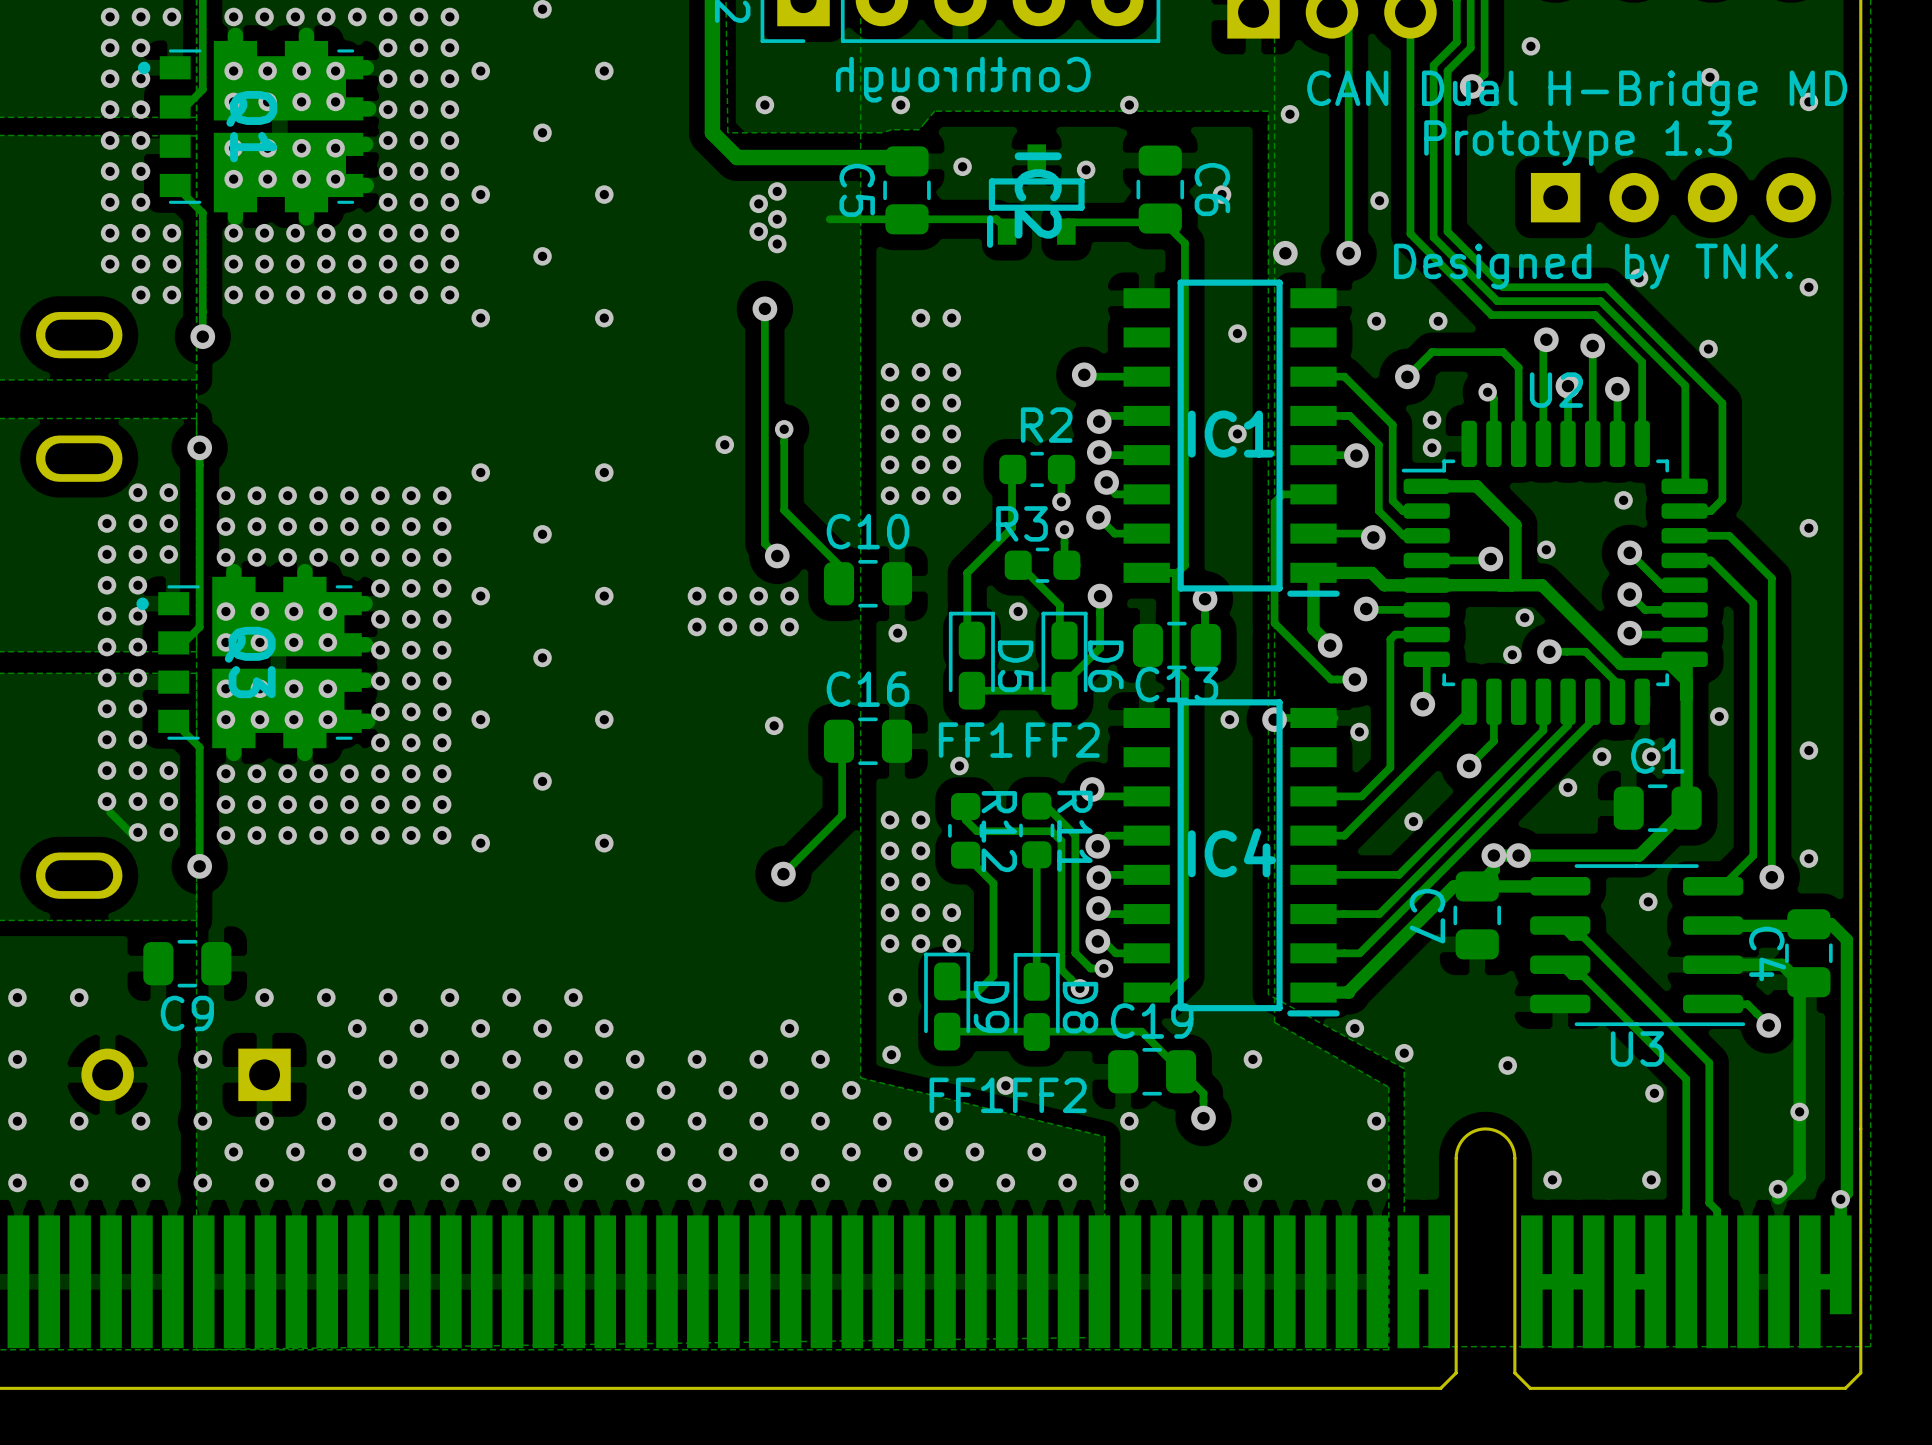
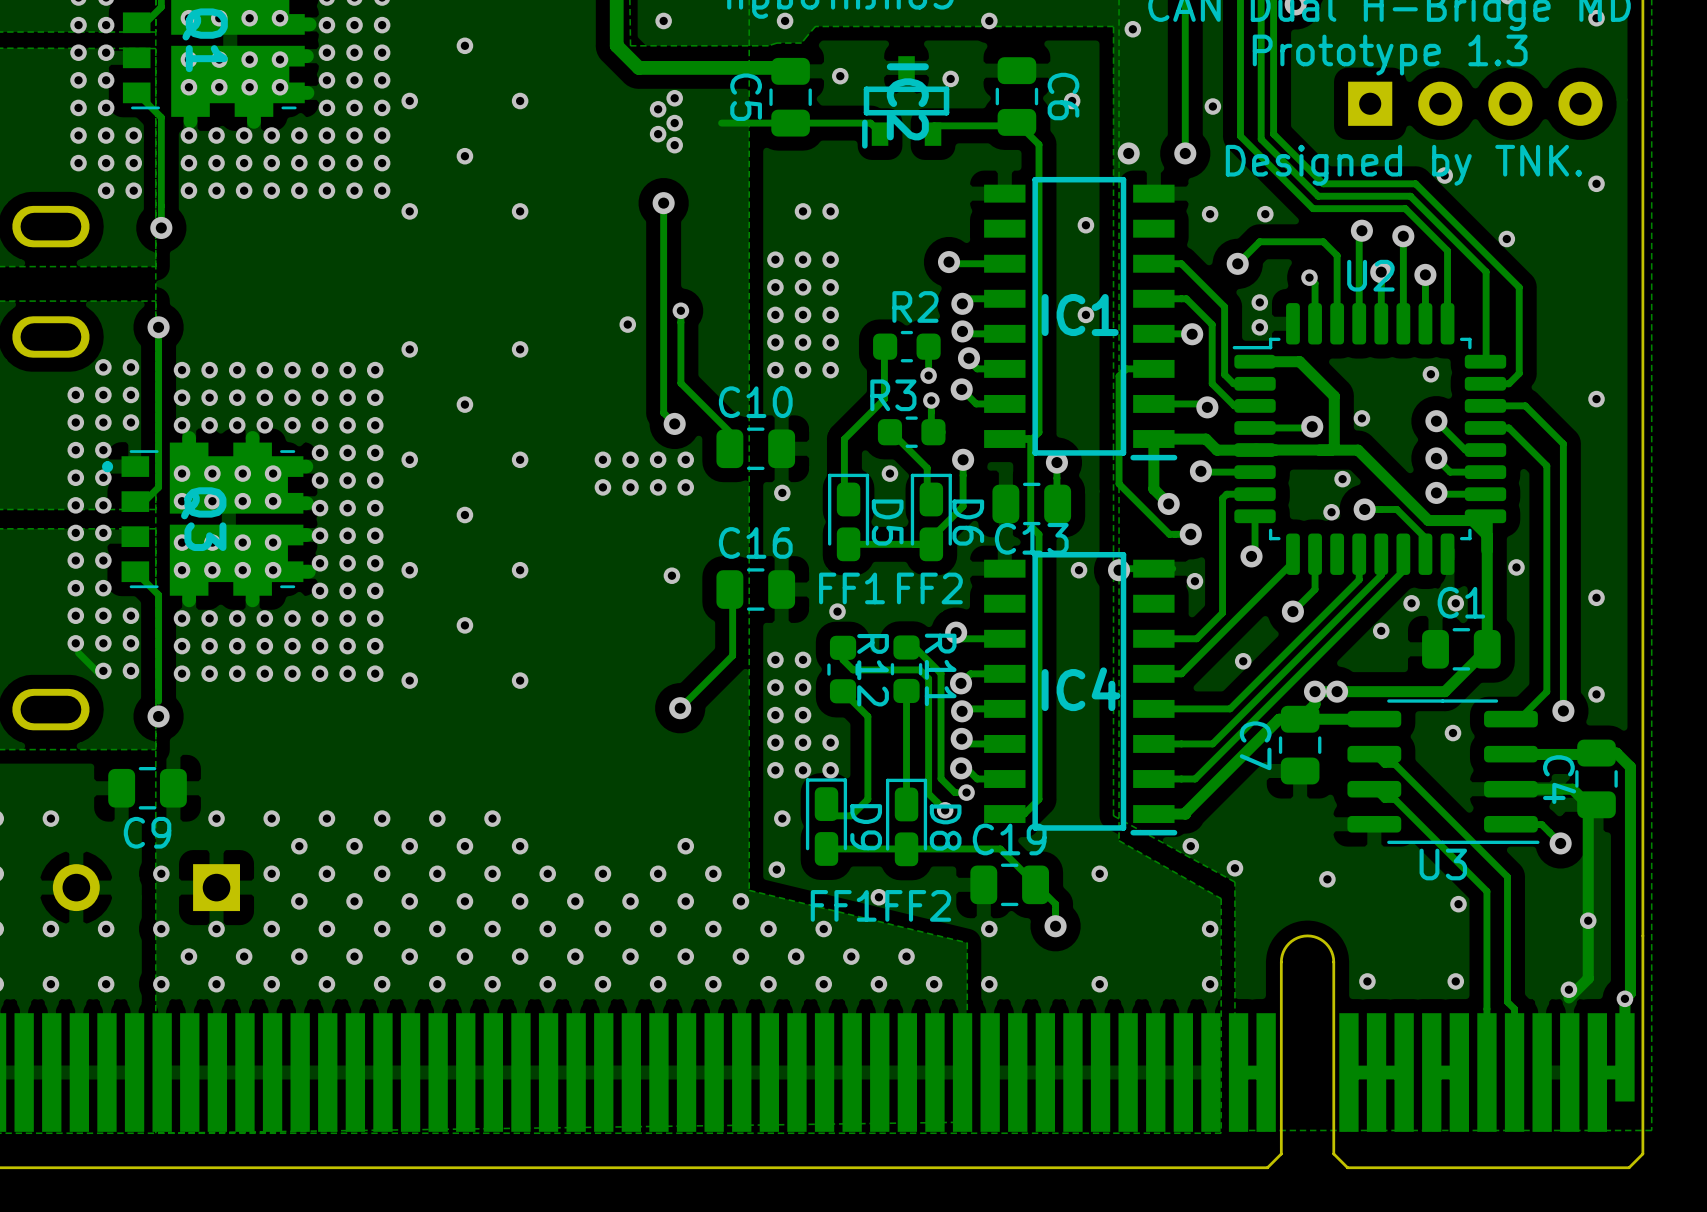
via position: (199, 866) -> (158, 716)

